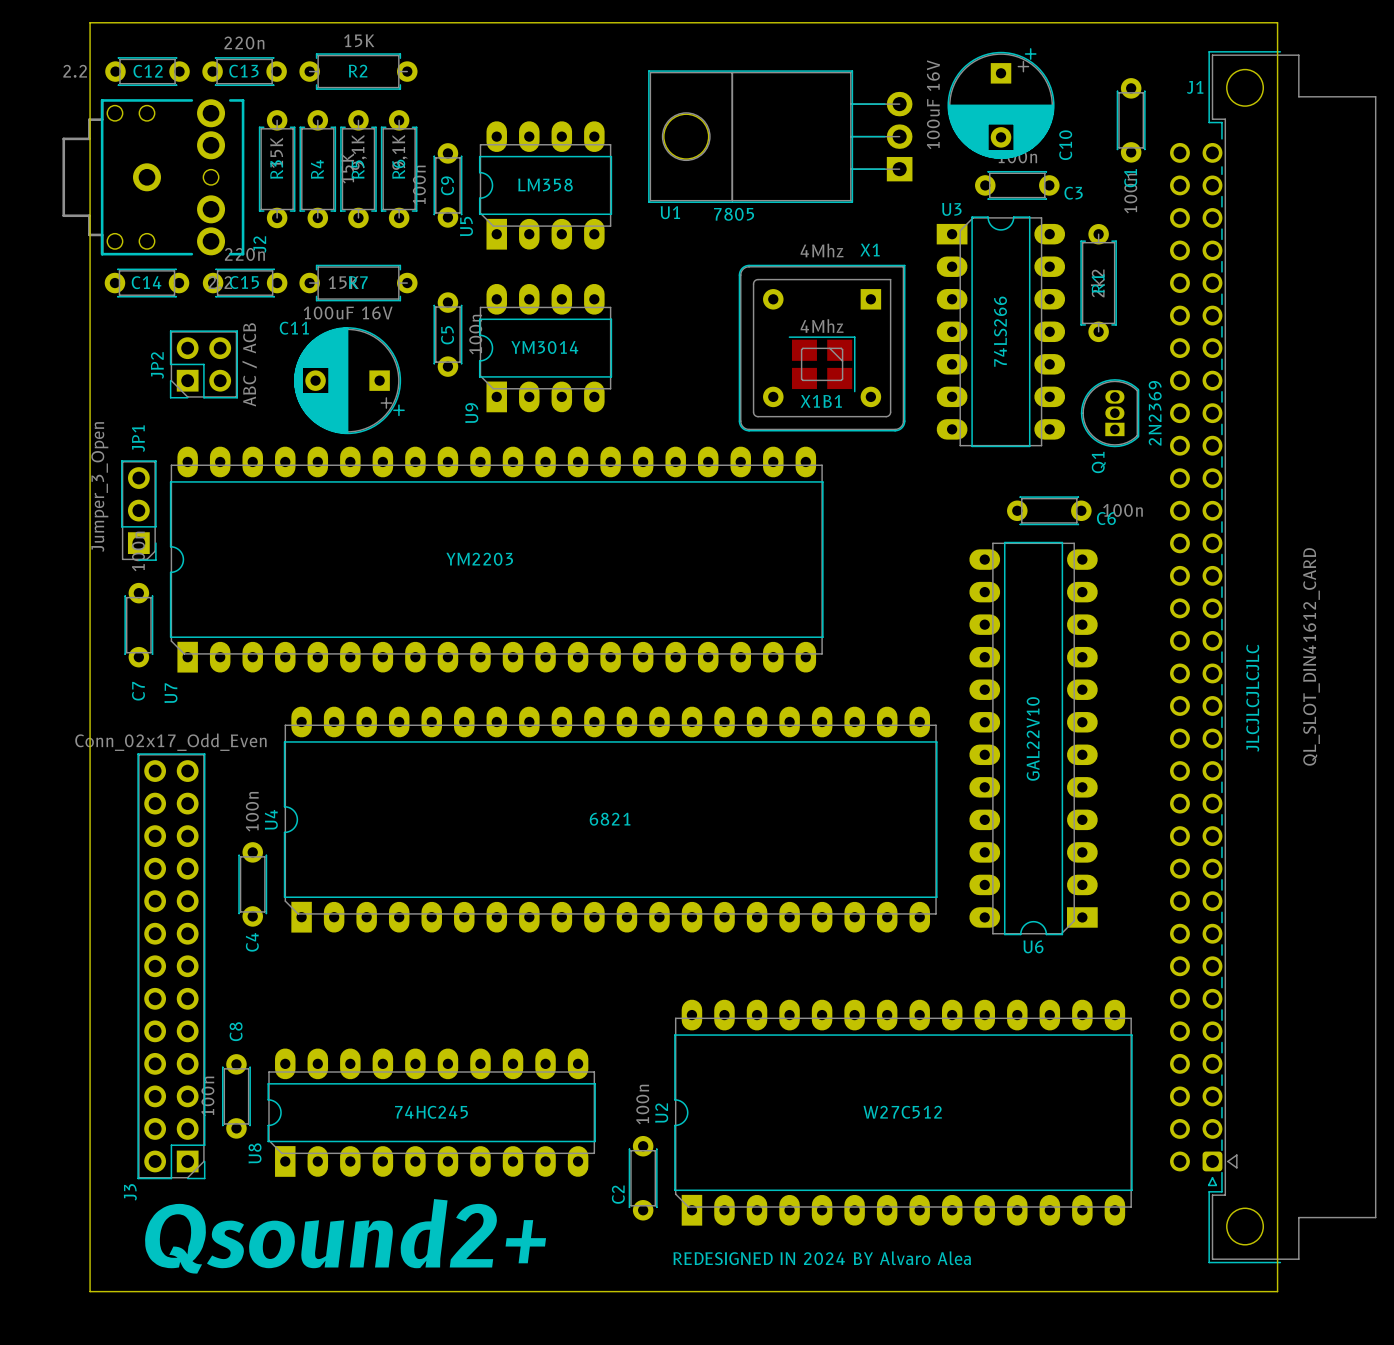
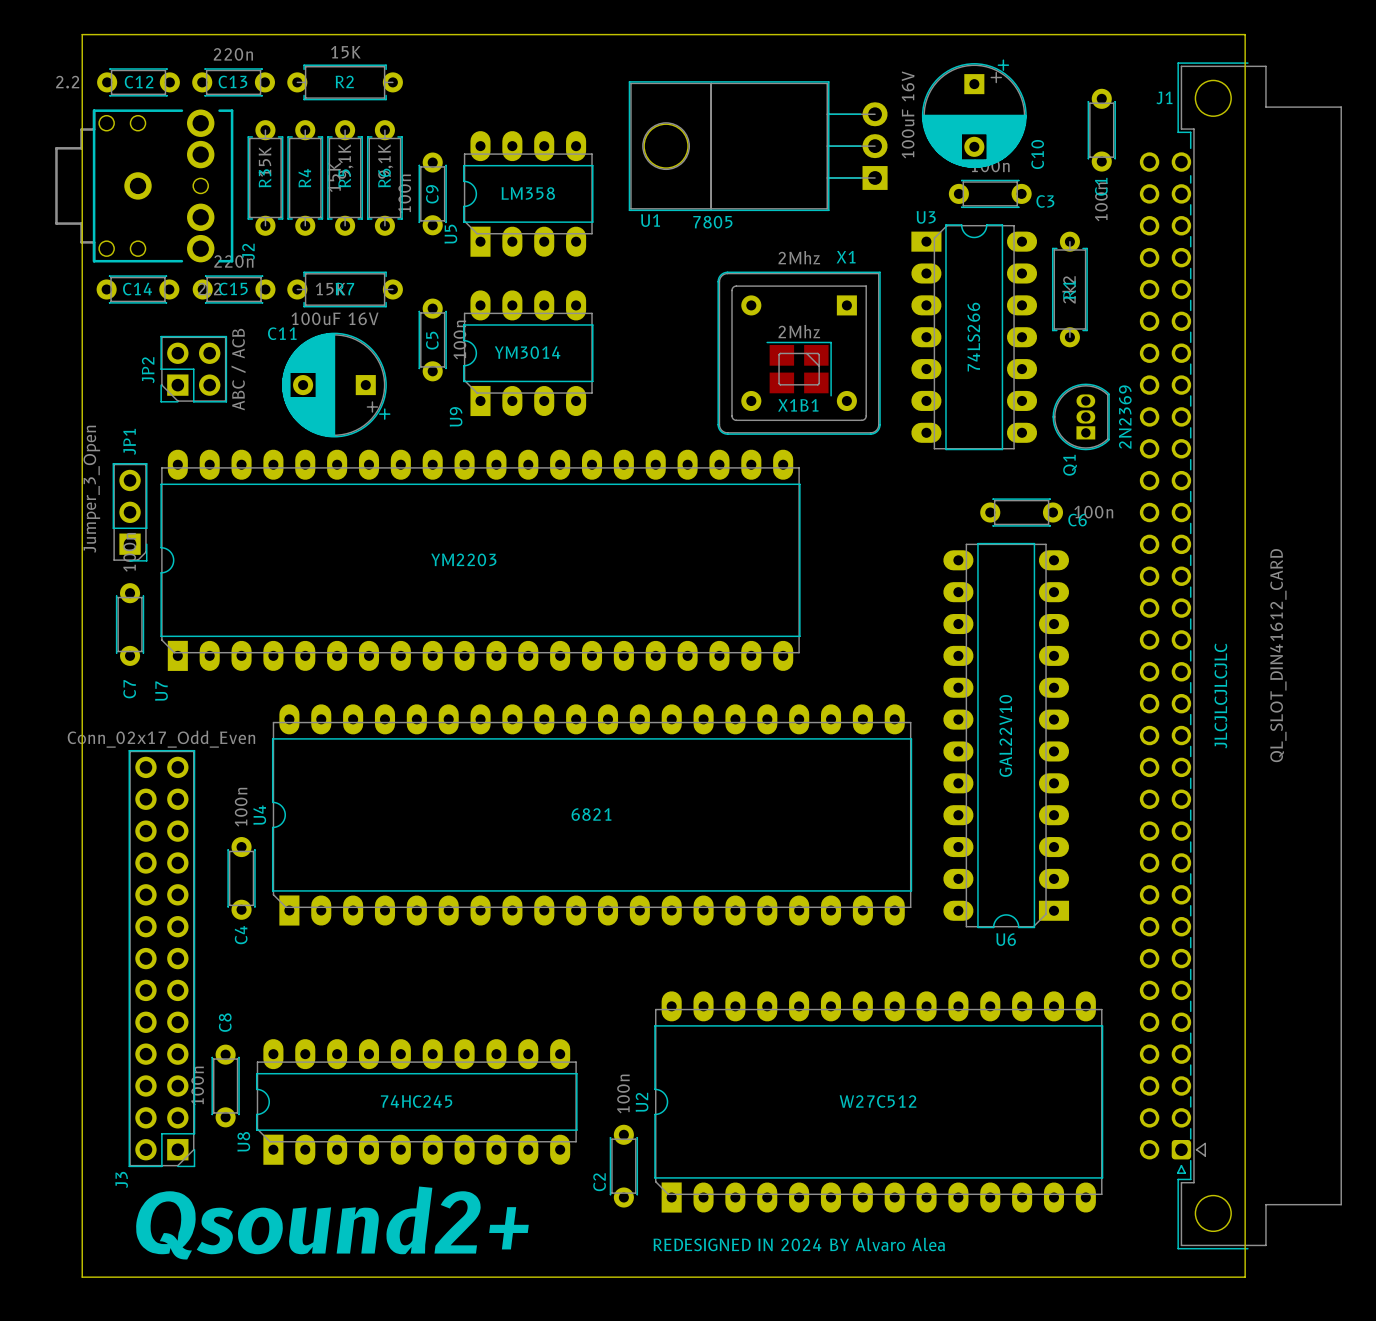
X1 value: 4Mhz (822, 250) -> 2Mhz (799, 257)
X1B1 value: 4Mhz (822, 326) -> 2Mhz (799, 331)

